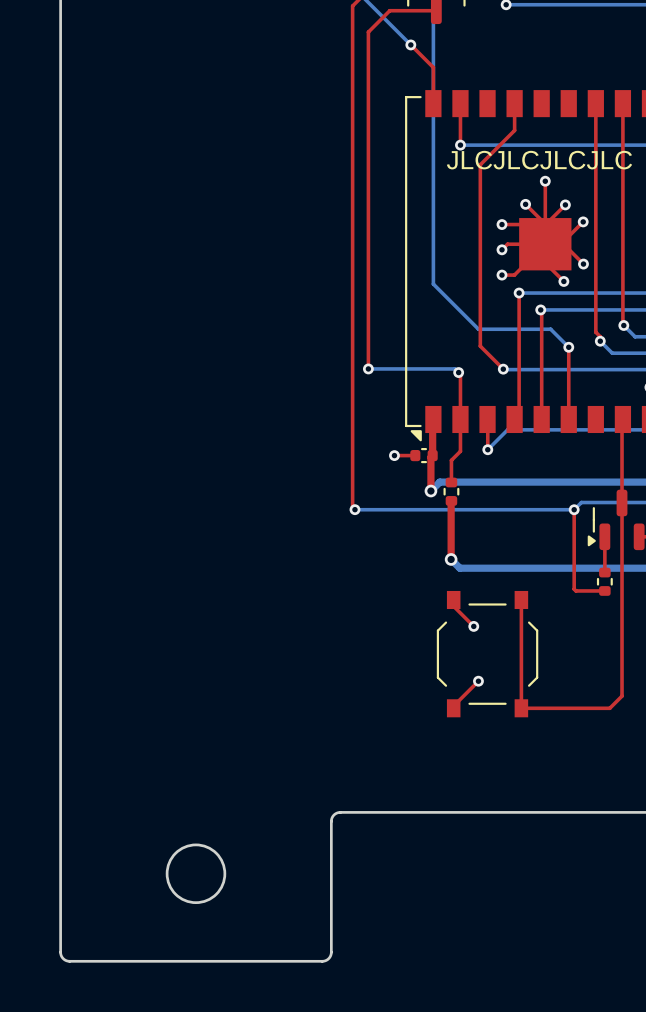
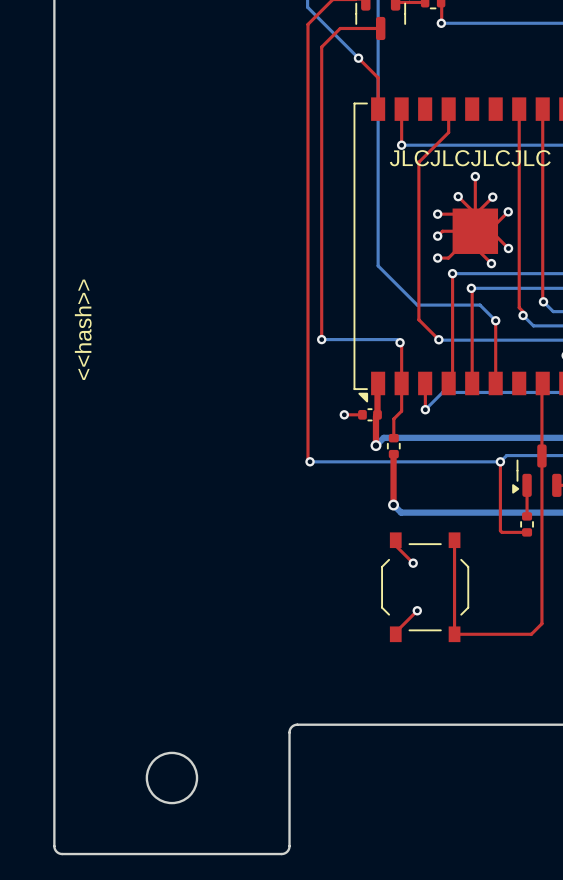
text: none -> <<hash>> (83, 329)

